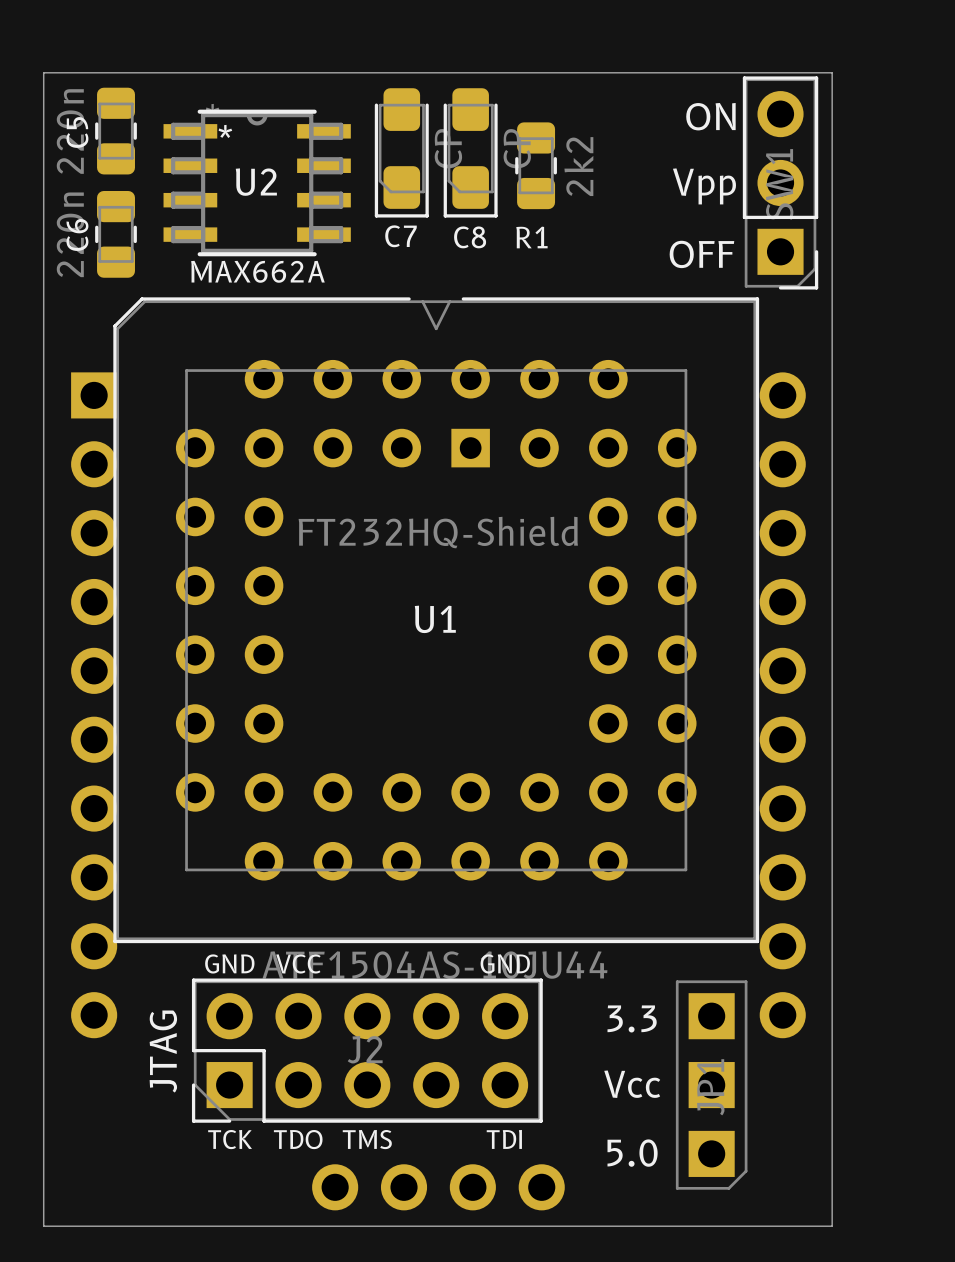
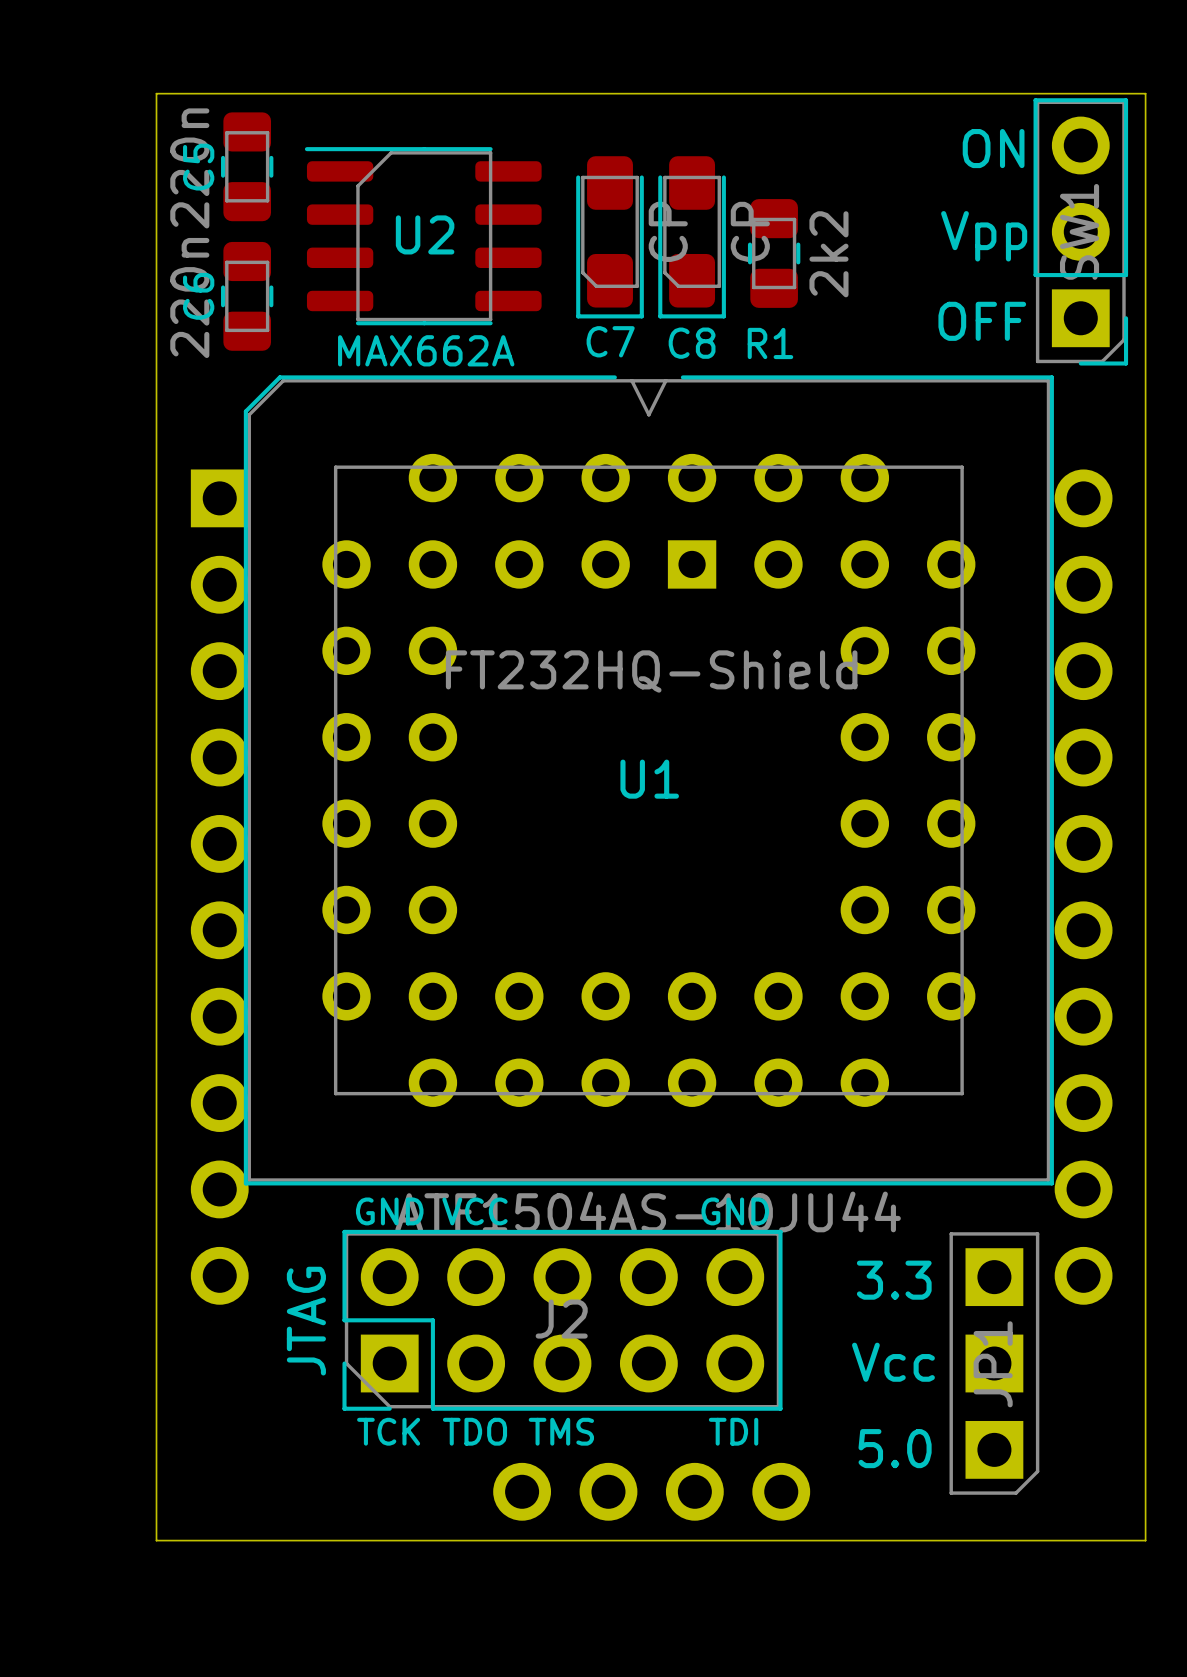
U2 footprint: [163, 109, 351, 257] -> [304, 147, 542, 326]
C7 position: (401, 152) -> (610, 237)
C8 position: (470, 152) -> (692, 237)
R1 position: (536, 165) -> (774, 253)

